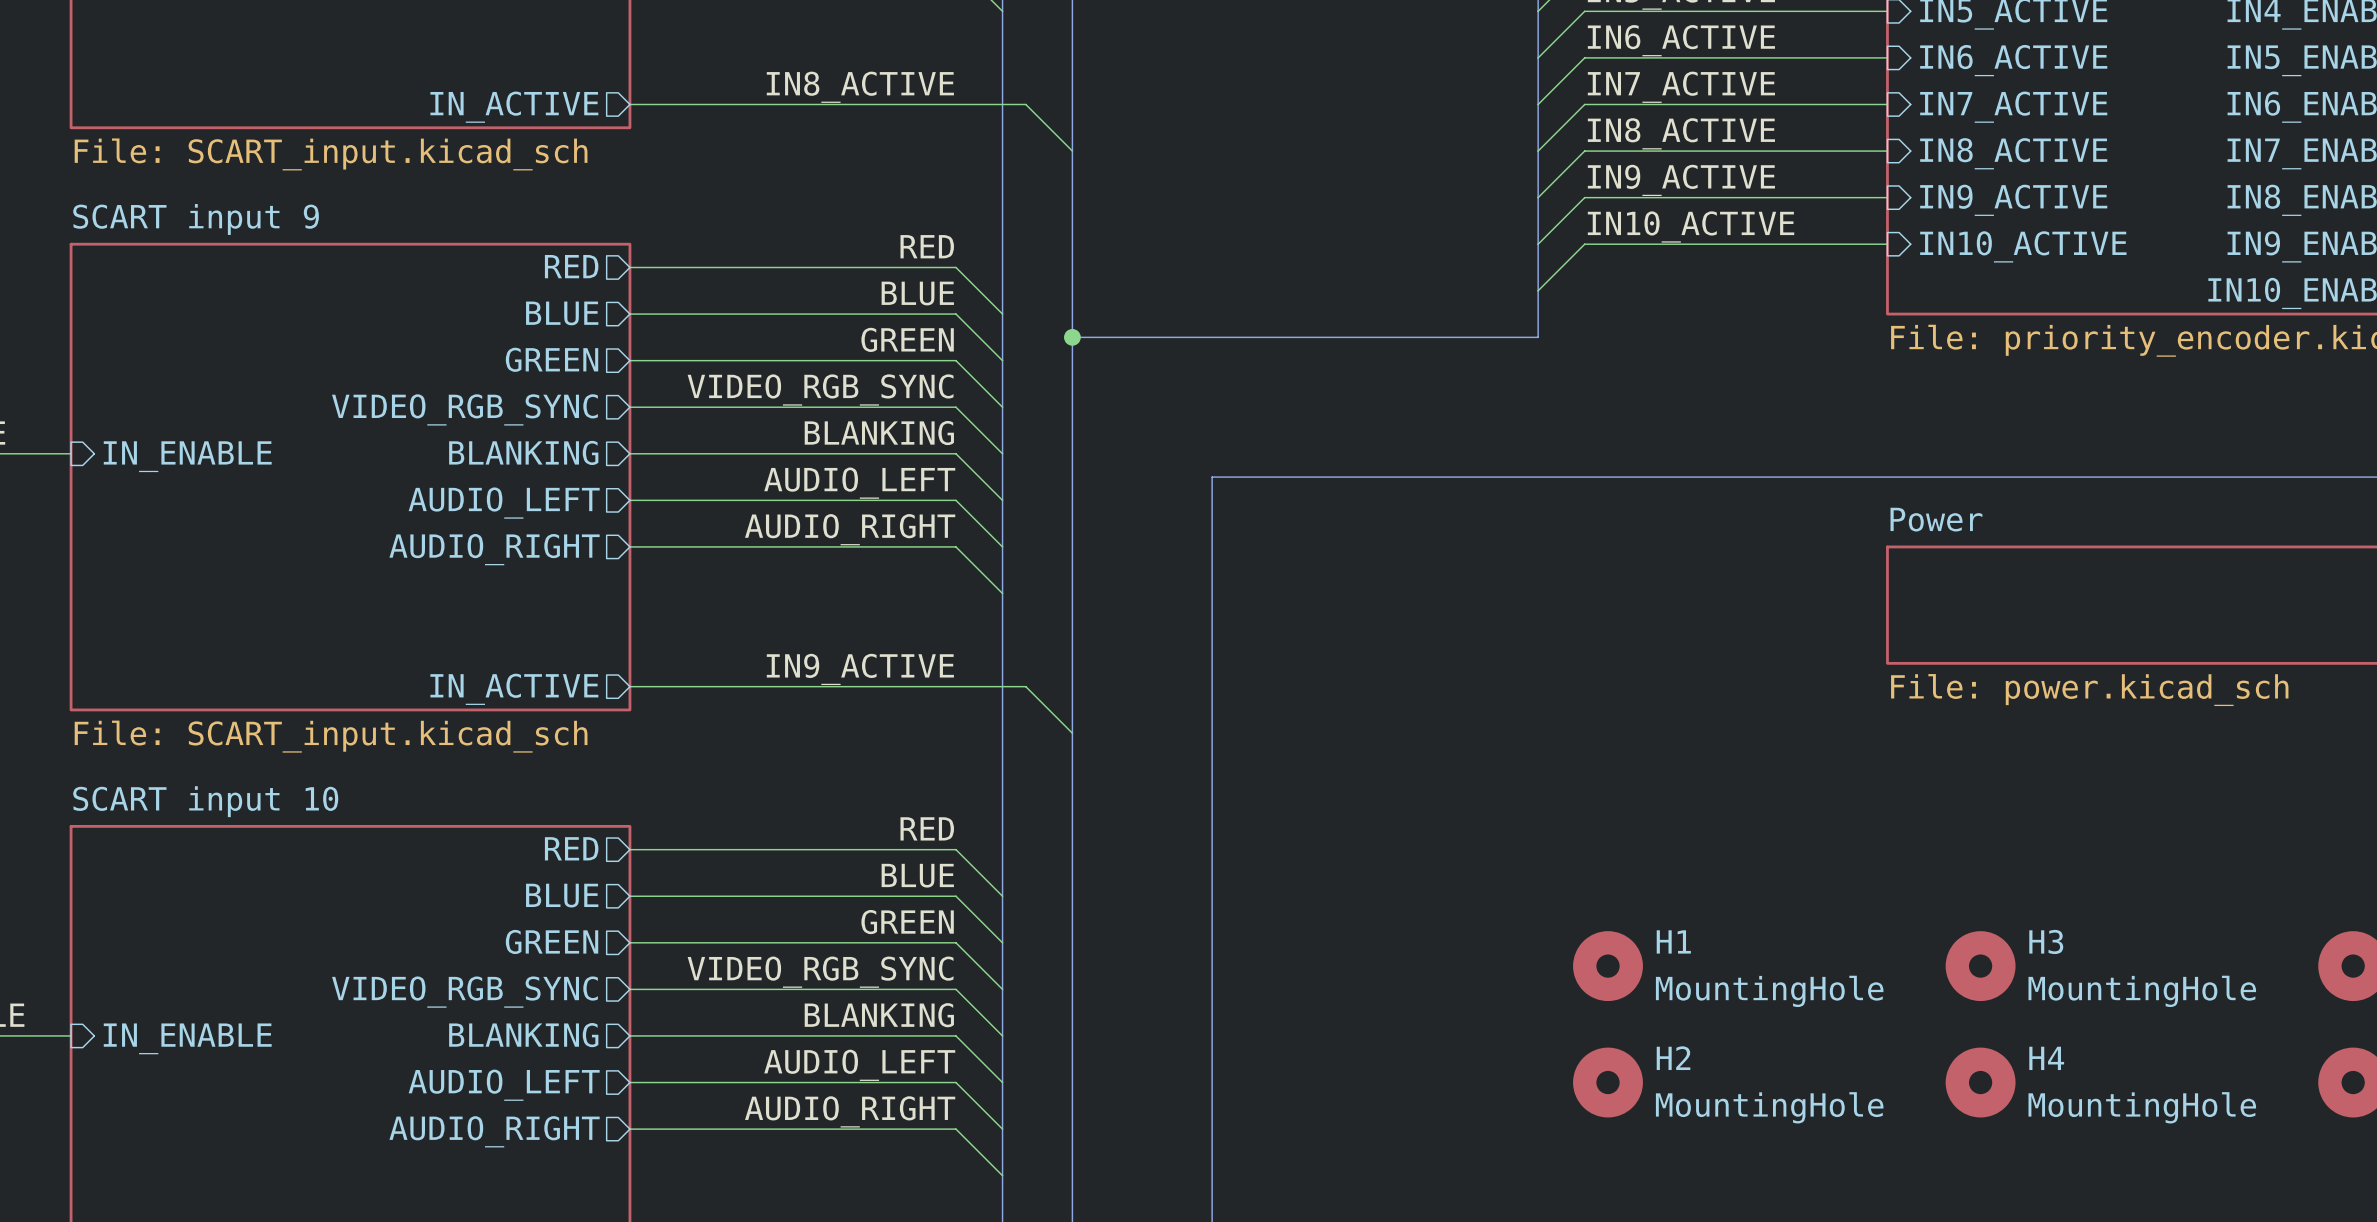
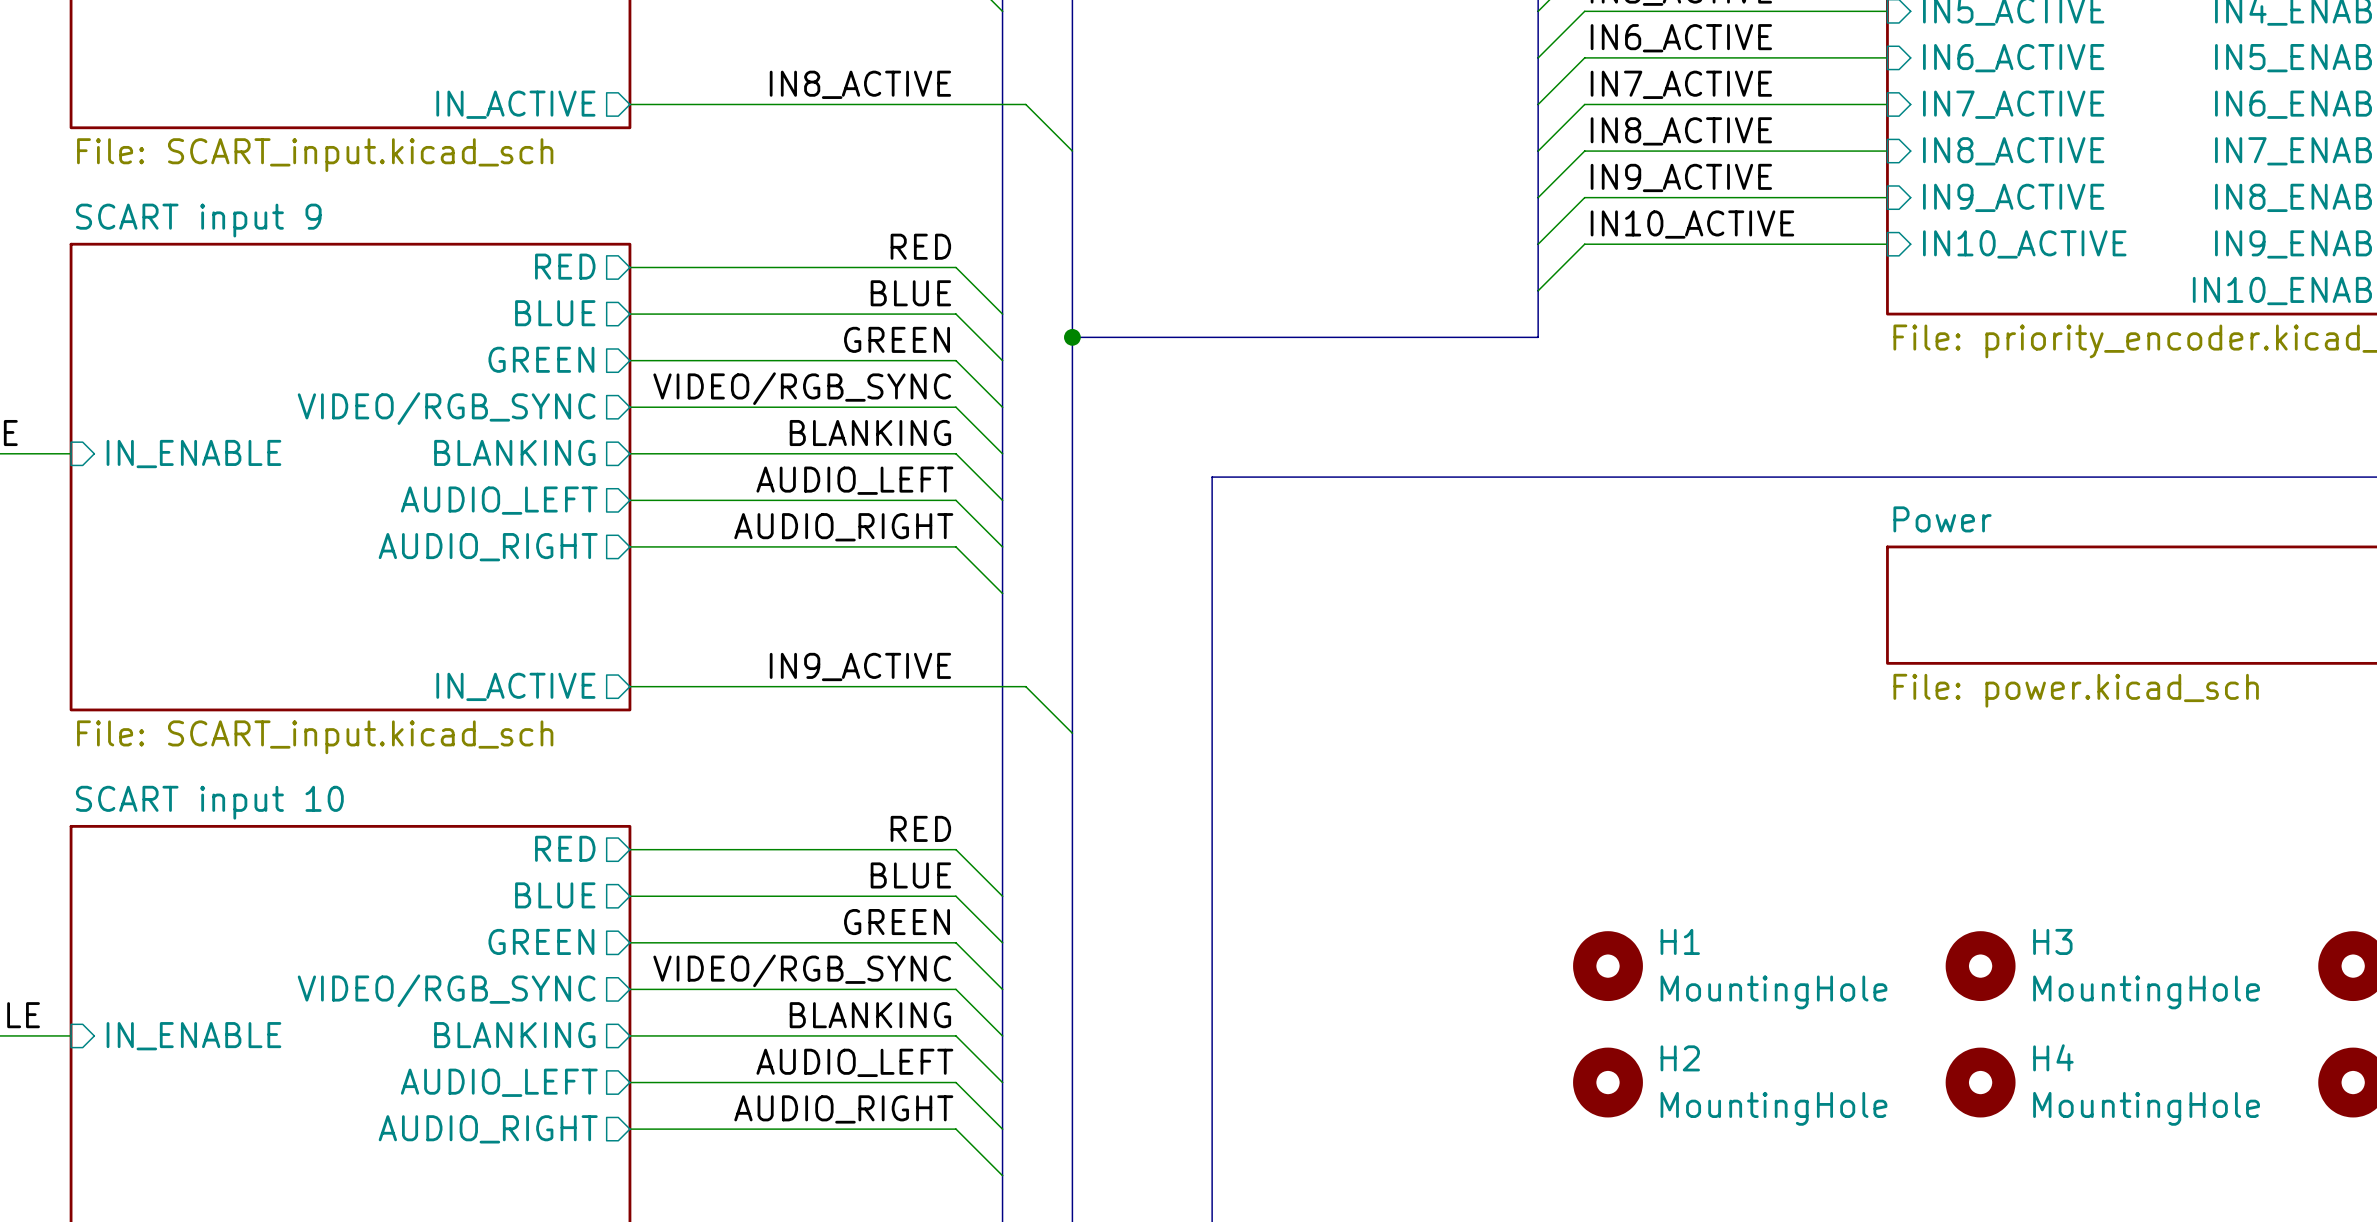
label: VIDEO_RGB_SYNC (820, 389) -> VIDEO/RGB_SYNC (802, 388)
sheet pin: VIDEO_RGB_SYNC (464, 409) -> VIDEO/RGB_SYNC (446, 408)
label: VIDEO_RGB_SYNC (820, 972) -> VIDEO/RGB_SYNC (802, 970)
sheet pin: VIDEO_RGB_SYNC (464, 992) -> VIDEO/RGB_SYNC (446, 990)

